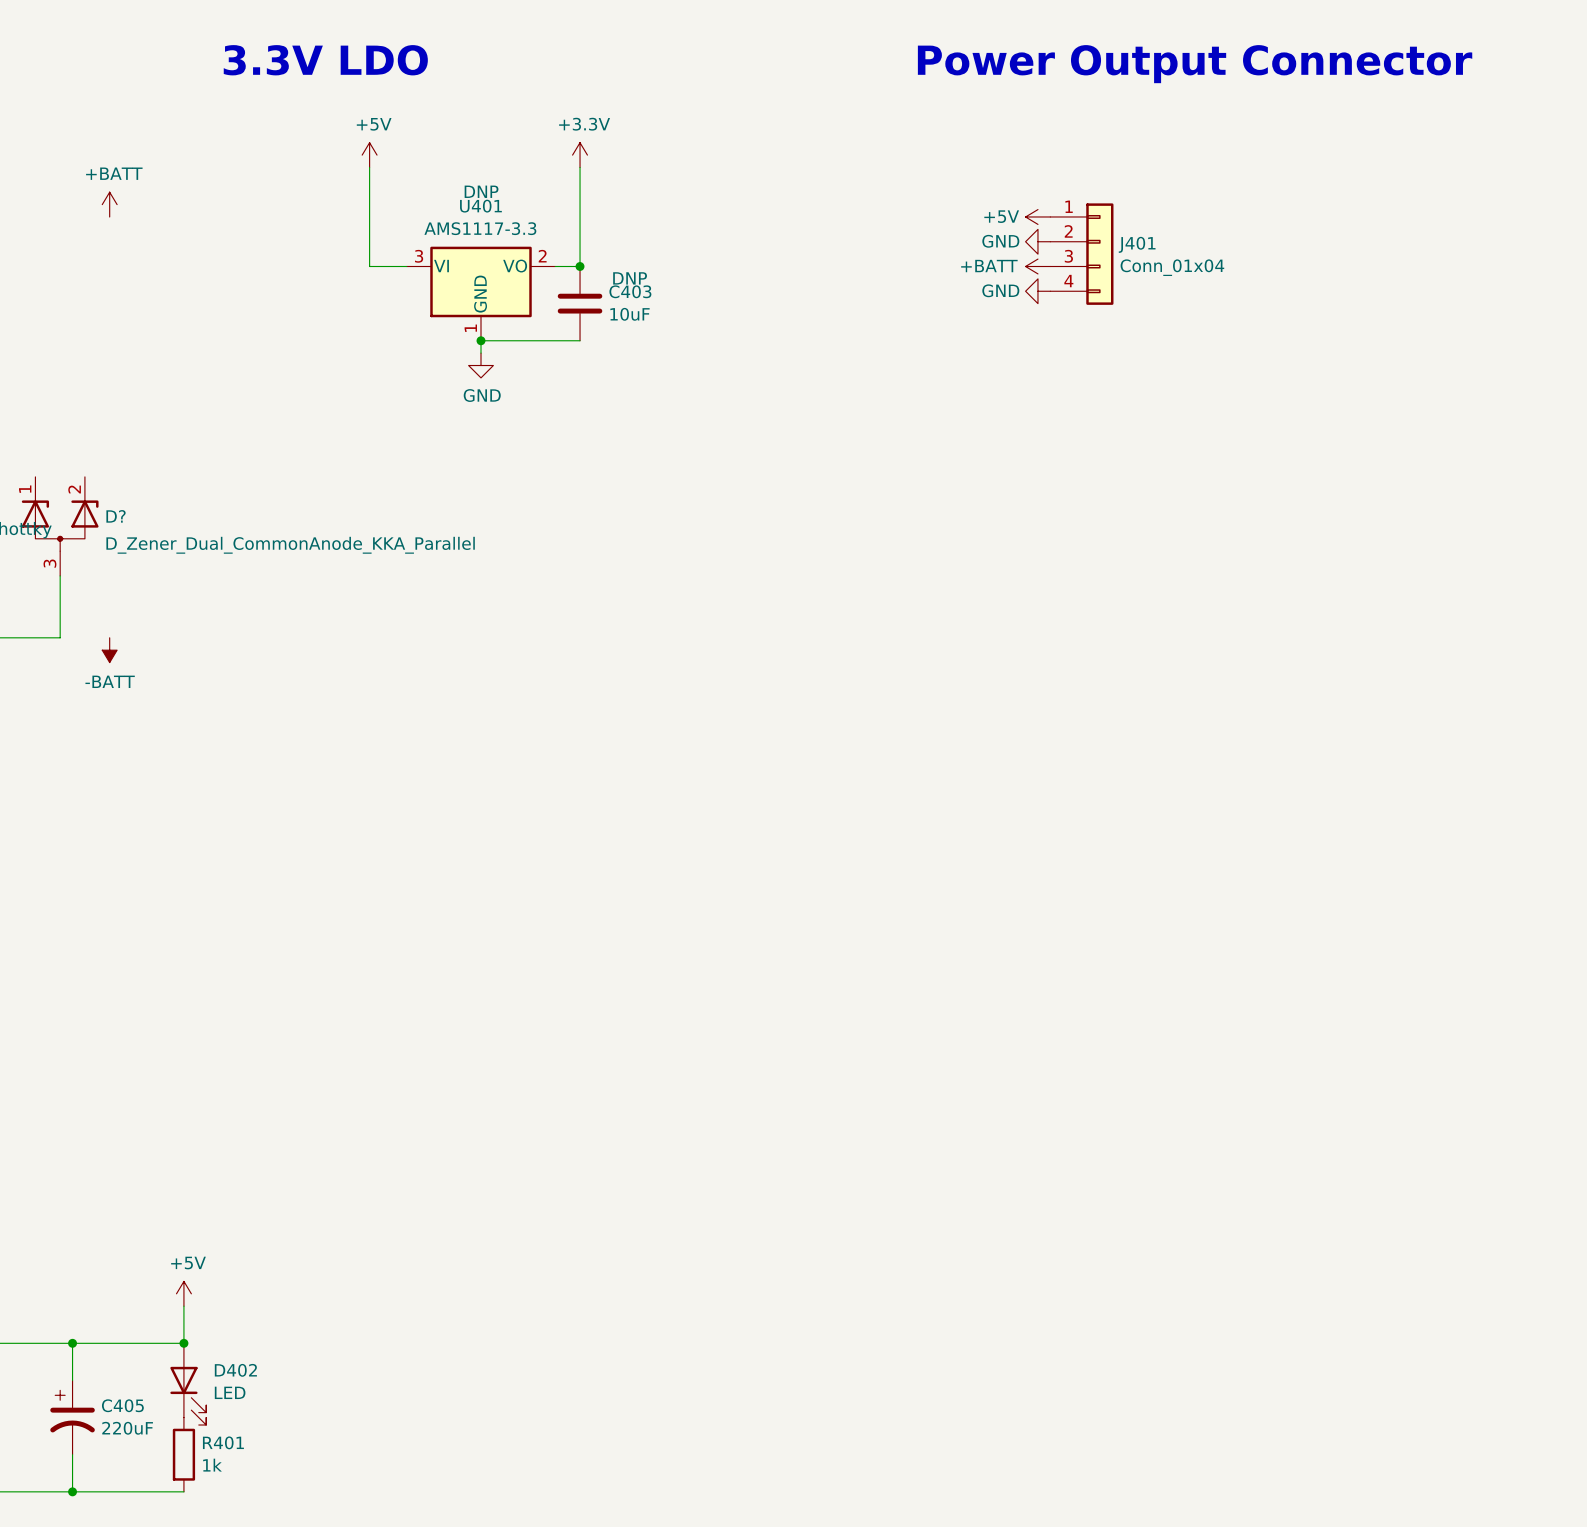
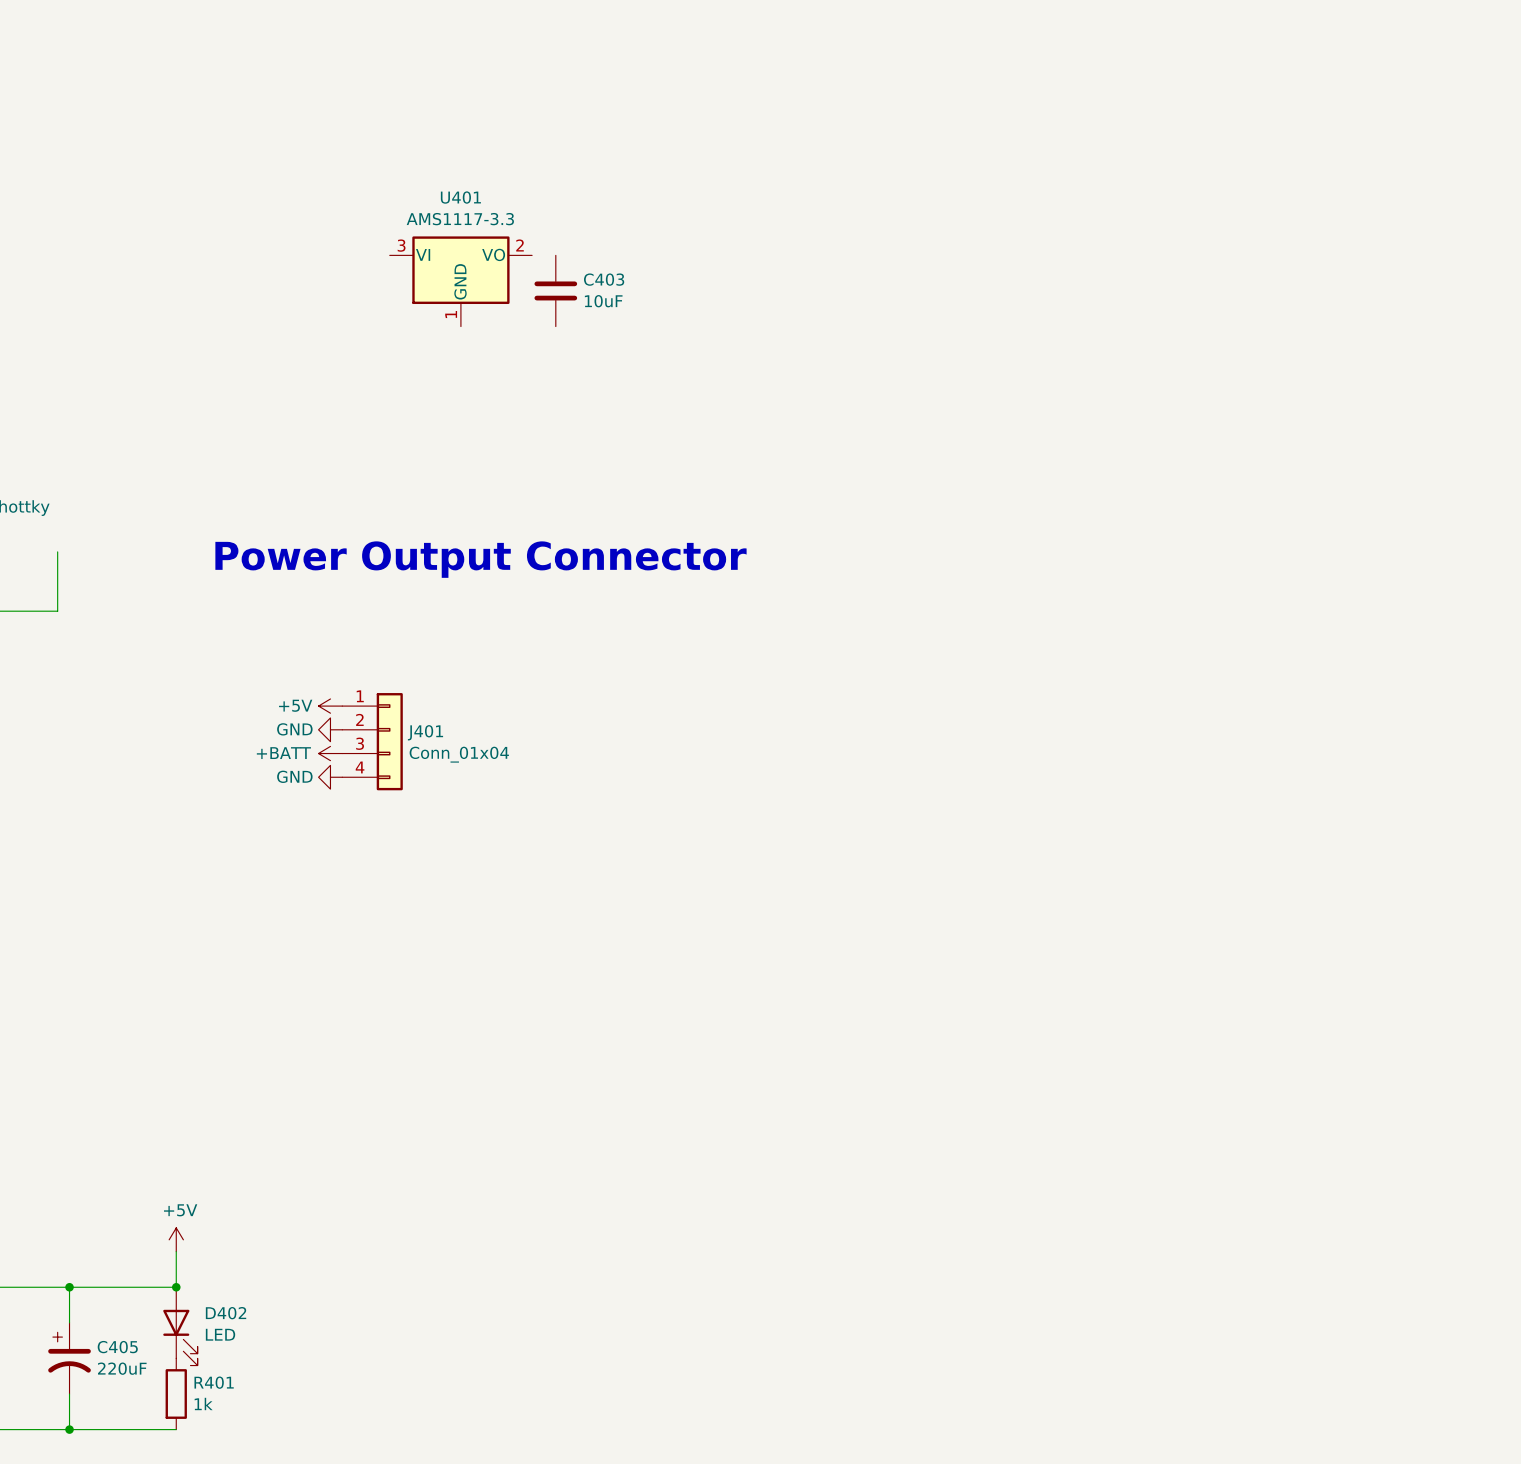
text: 3.3V LDO (325, 60) -> none
text: Power Output Connector (1195, 64) -> none
power symbol: +5V (369, 155) -> none
power symbol: +3.3V (580, 155) -> none
wire: (369, 167) (369, 266) (406, 266) -> none
wire: (580, 167) (580, 266) (555, 266) -> none
U401 text: DNP (481, 191) -> none
power symbol: +BATT (109, 204) -> none
power symbol: +5V (1037, 216) -> none
power symbol: GND (1037, 241) -> none
J401 position: (1081, 254) -> (372, 741)
junction: (580, 266) -> none
power symbol: +BATT (1037, 266) -> none
C403 text: DNP (630, 278) -> none
power symbol: GND (1037, 291) -> none
junction: (481, 340) -> none
wire: (580, 340) (481, 340) (481, 353) -> none
power symbol: GND (481, 365) -> none
D?: D_Zener_Dual_CommonAnode_KKA_Parallel (60, 526) -> none
text: none -> Power Output Connector (480, 559)
power symbol: -BATT (109, 650) -> none
power symbol: none -> +5V (330, 706)
power symbol: none -> GND (330, 729)
power symbol: none -> +BATT (330, 753)
power symbol: none -> GND (330, 777)

